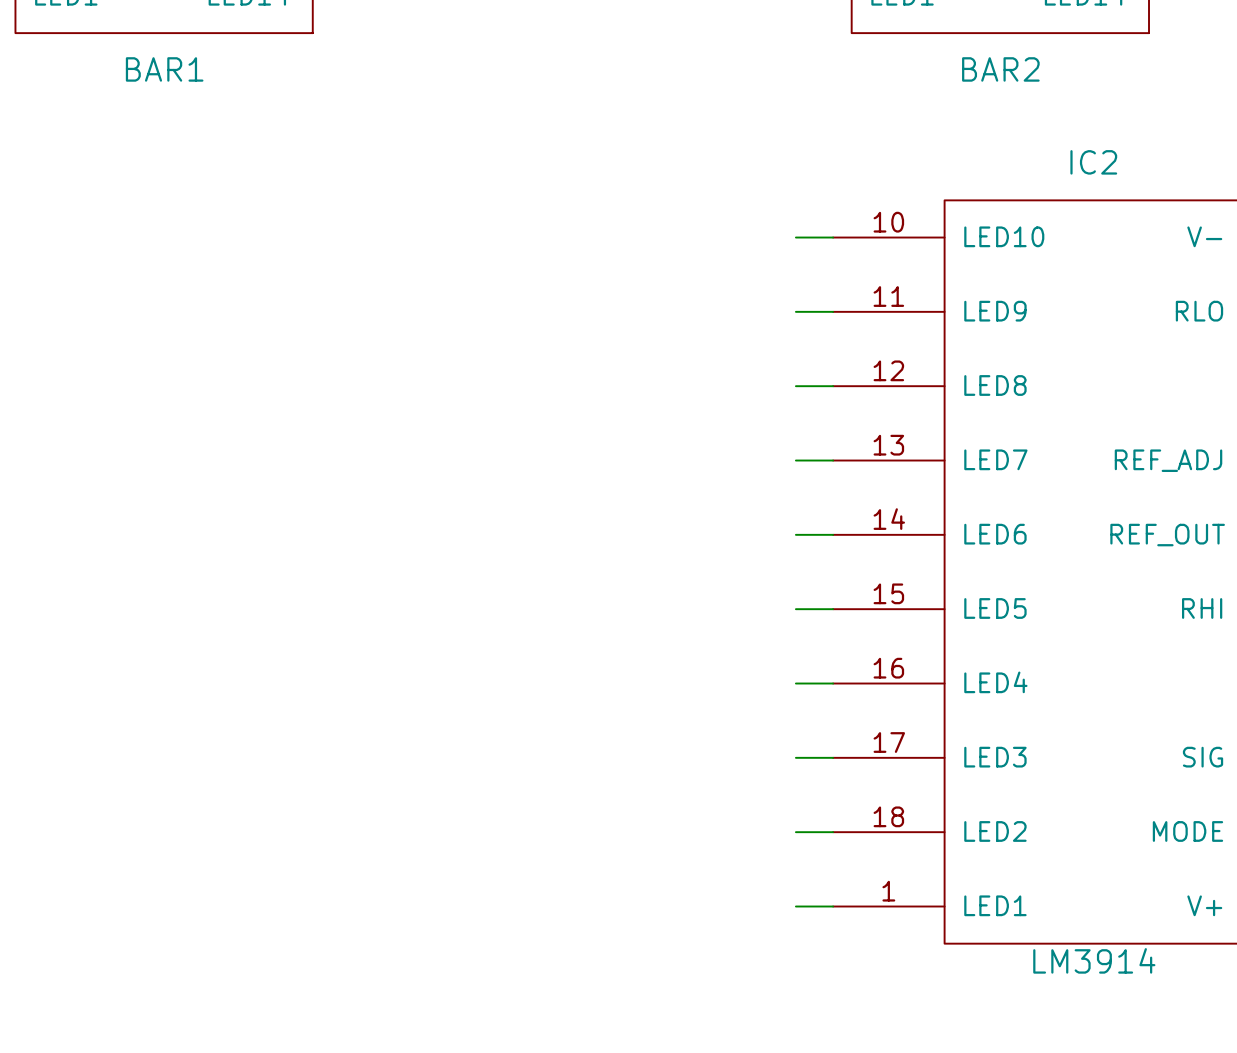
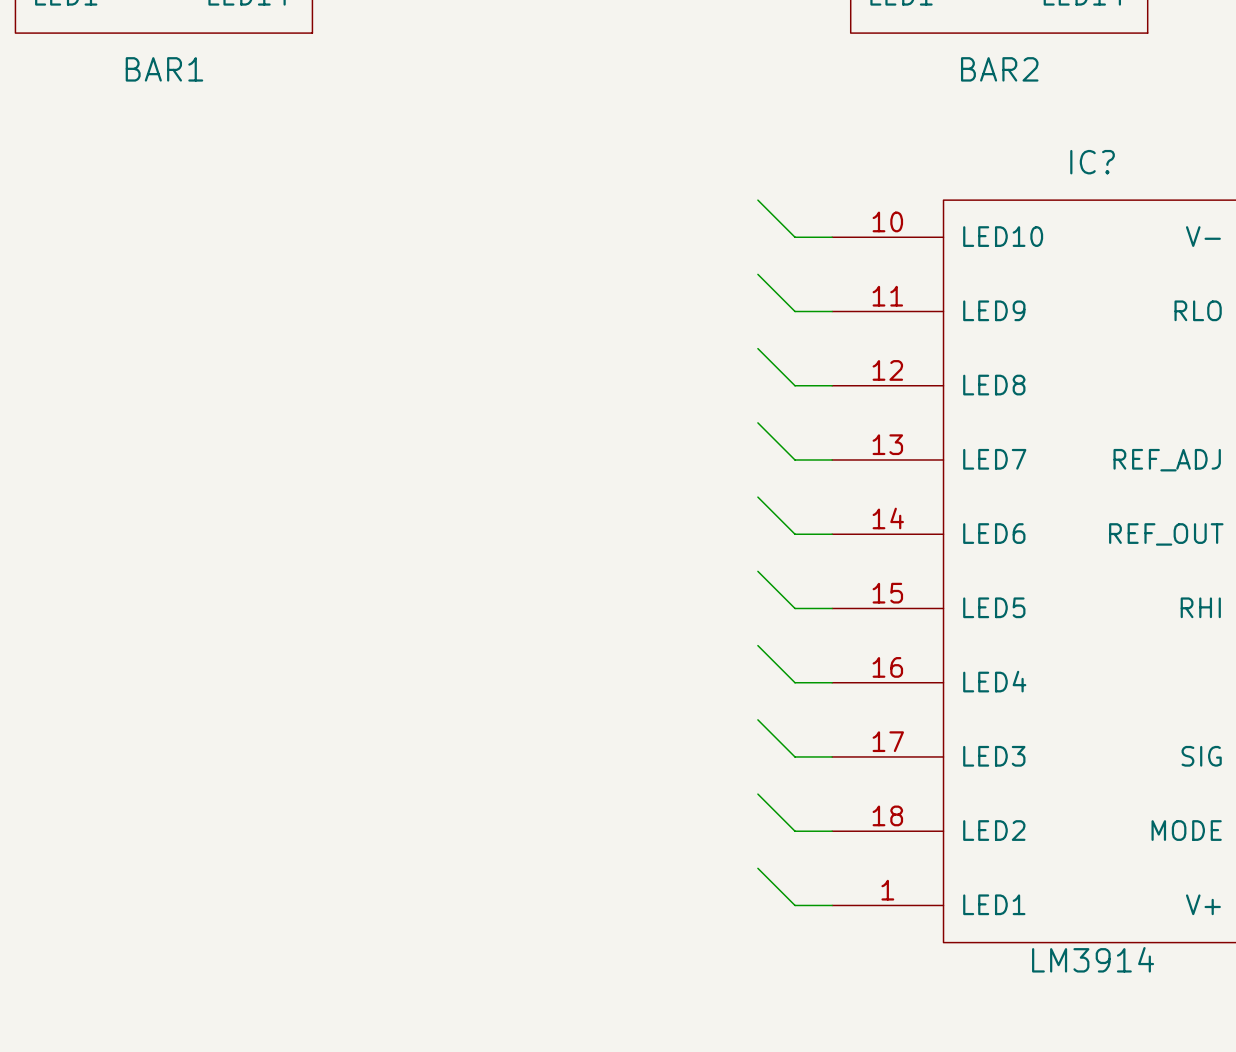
IC2 name: IC2 (1093, 162) -> IC? (1092, 162)
wire: none -> (757, 200) (795, 237)
wire: none -> (757, 274) (795, 311)
wire: none -> (757, 348) (795, 385)
wire: none -> (757, 422) (795, 459)
wire: none -> (757, 497) (795, 534)
wire: none -> (757, 571) (795, 608)
wire: none -> (757, 645) (795, 682)
wire: none -> (757, 719) (795, 756)
wire: none -> (757, 794) (795, 831)
wire: none -> (757, 868) (795, 905)

